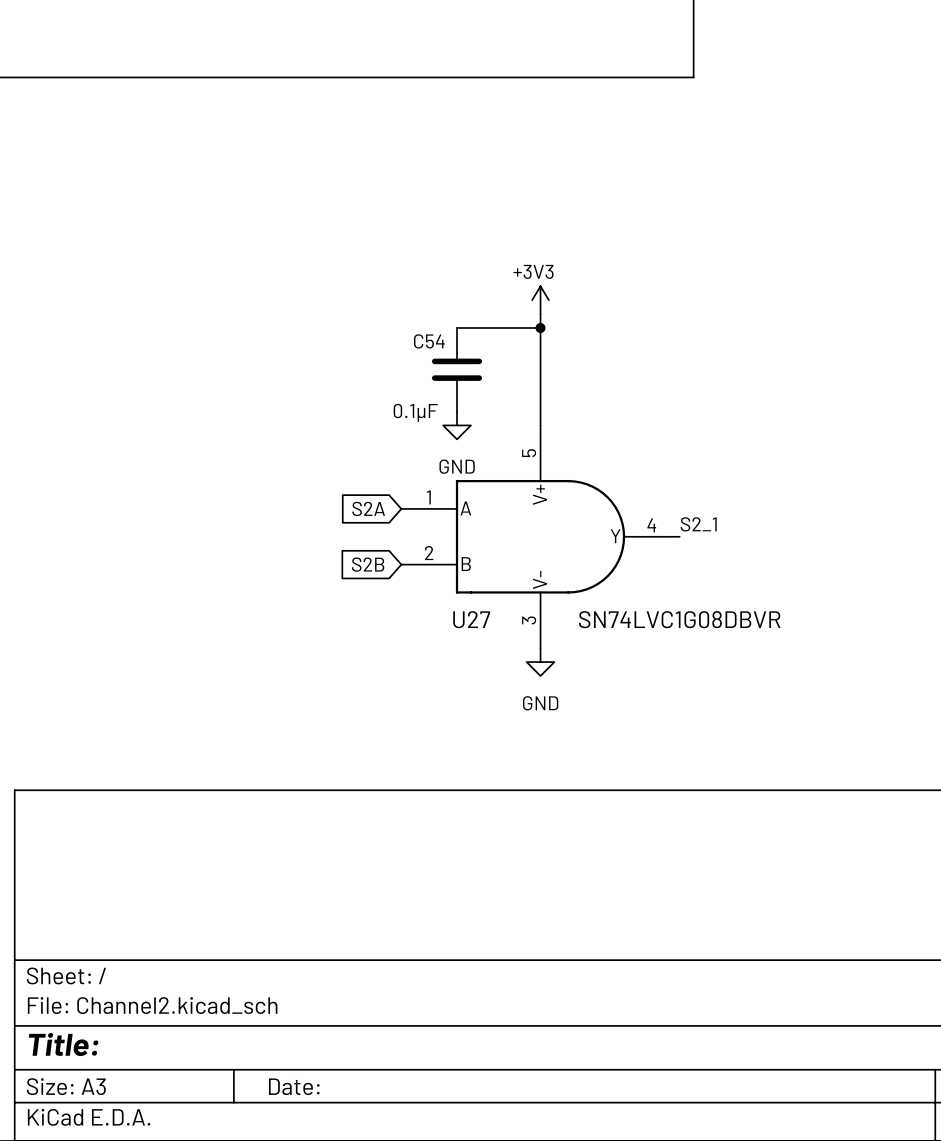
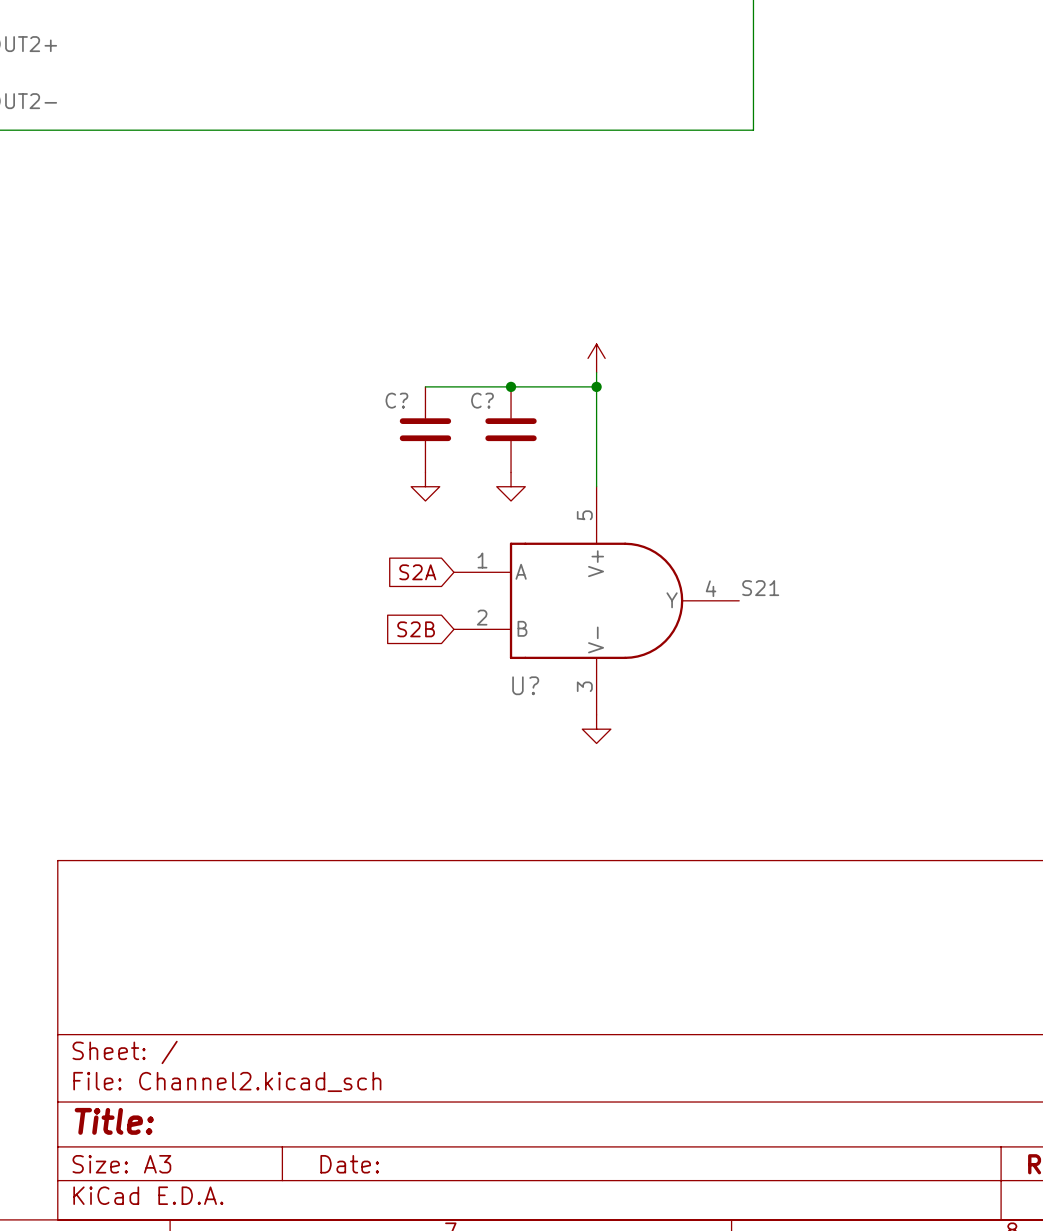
power symbol text: +3V3 (533, 271) -> none
wire: none -> (425, 386) (511, 386)
junction: none -> (511, 386)
C54 name: C54 (429, 341) -> C? (482, 400)
C?: none -> (425, 429)
C54 value: 0.1μF (415, 412) -> none
power symbol: none -> (425, 486)
power symbol text: GND (457, 466) -> none
label: S2_1 (698, 524) -> S21 (760, 588)
U27 name: U27 (471, 619) -> U? (525, 685)
U27 value: SN74LVC1G08DBVR (679, 619) -> none
power symbol text: GND (540, 703) -> none

